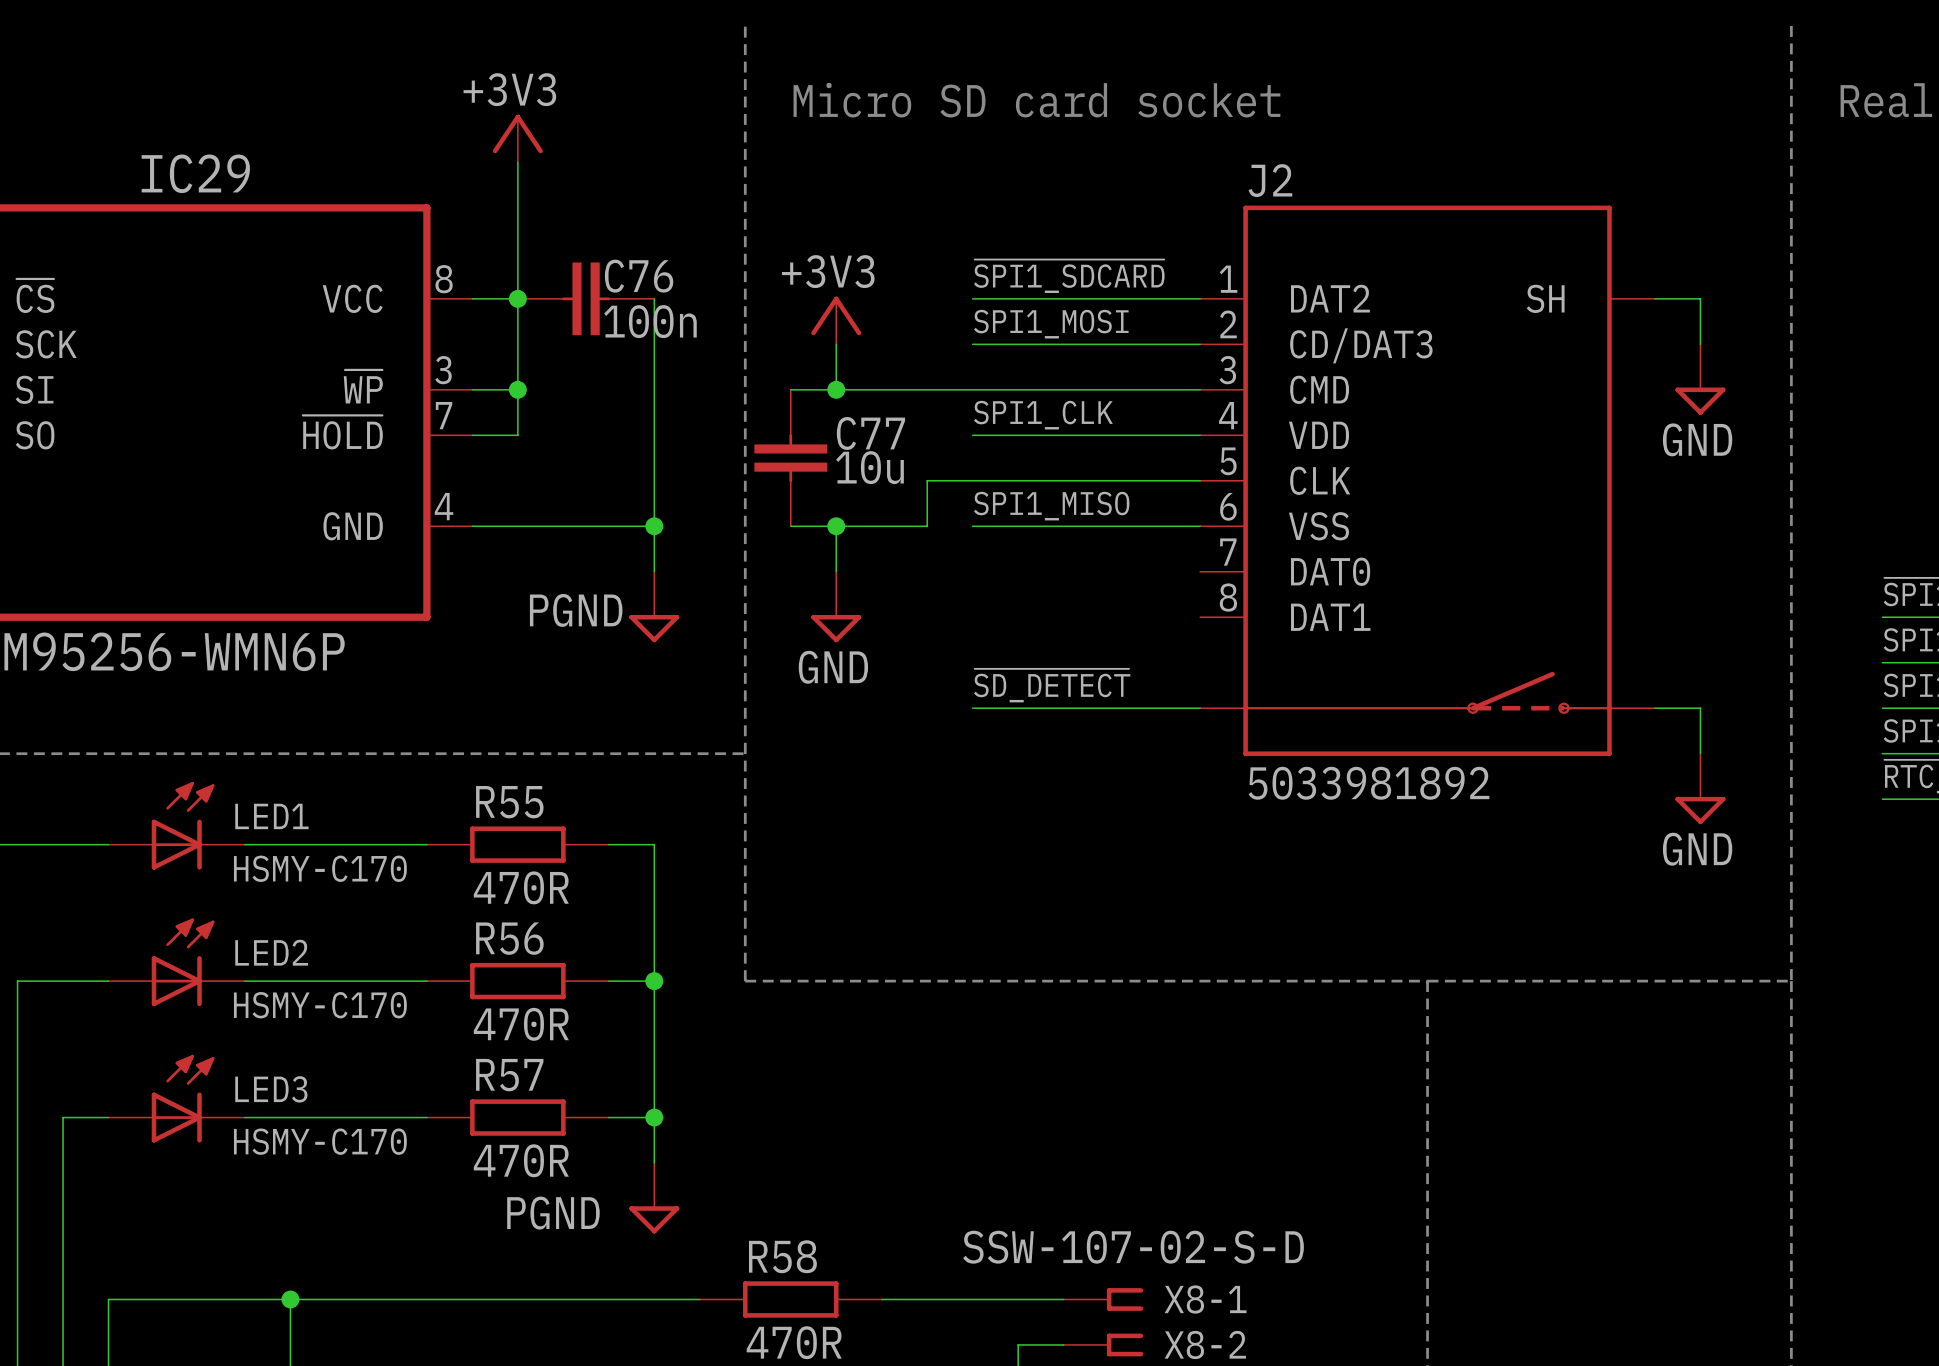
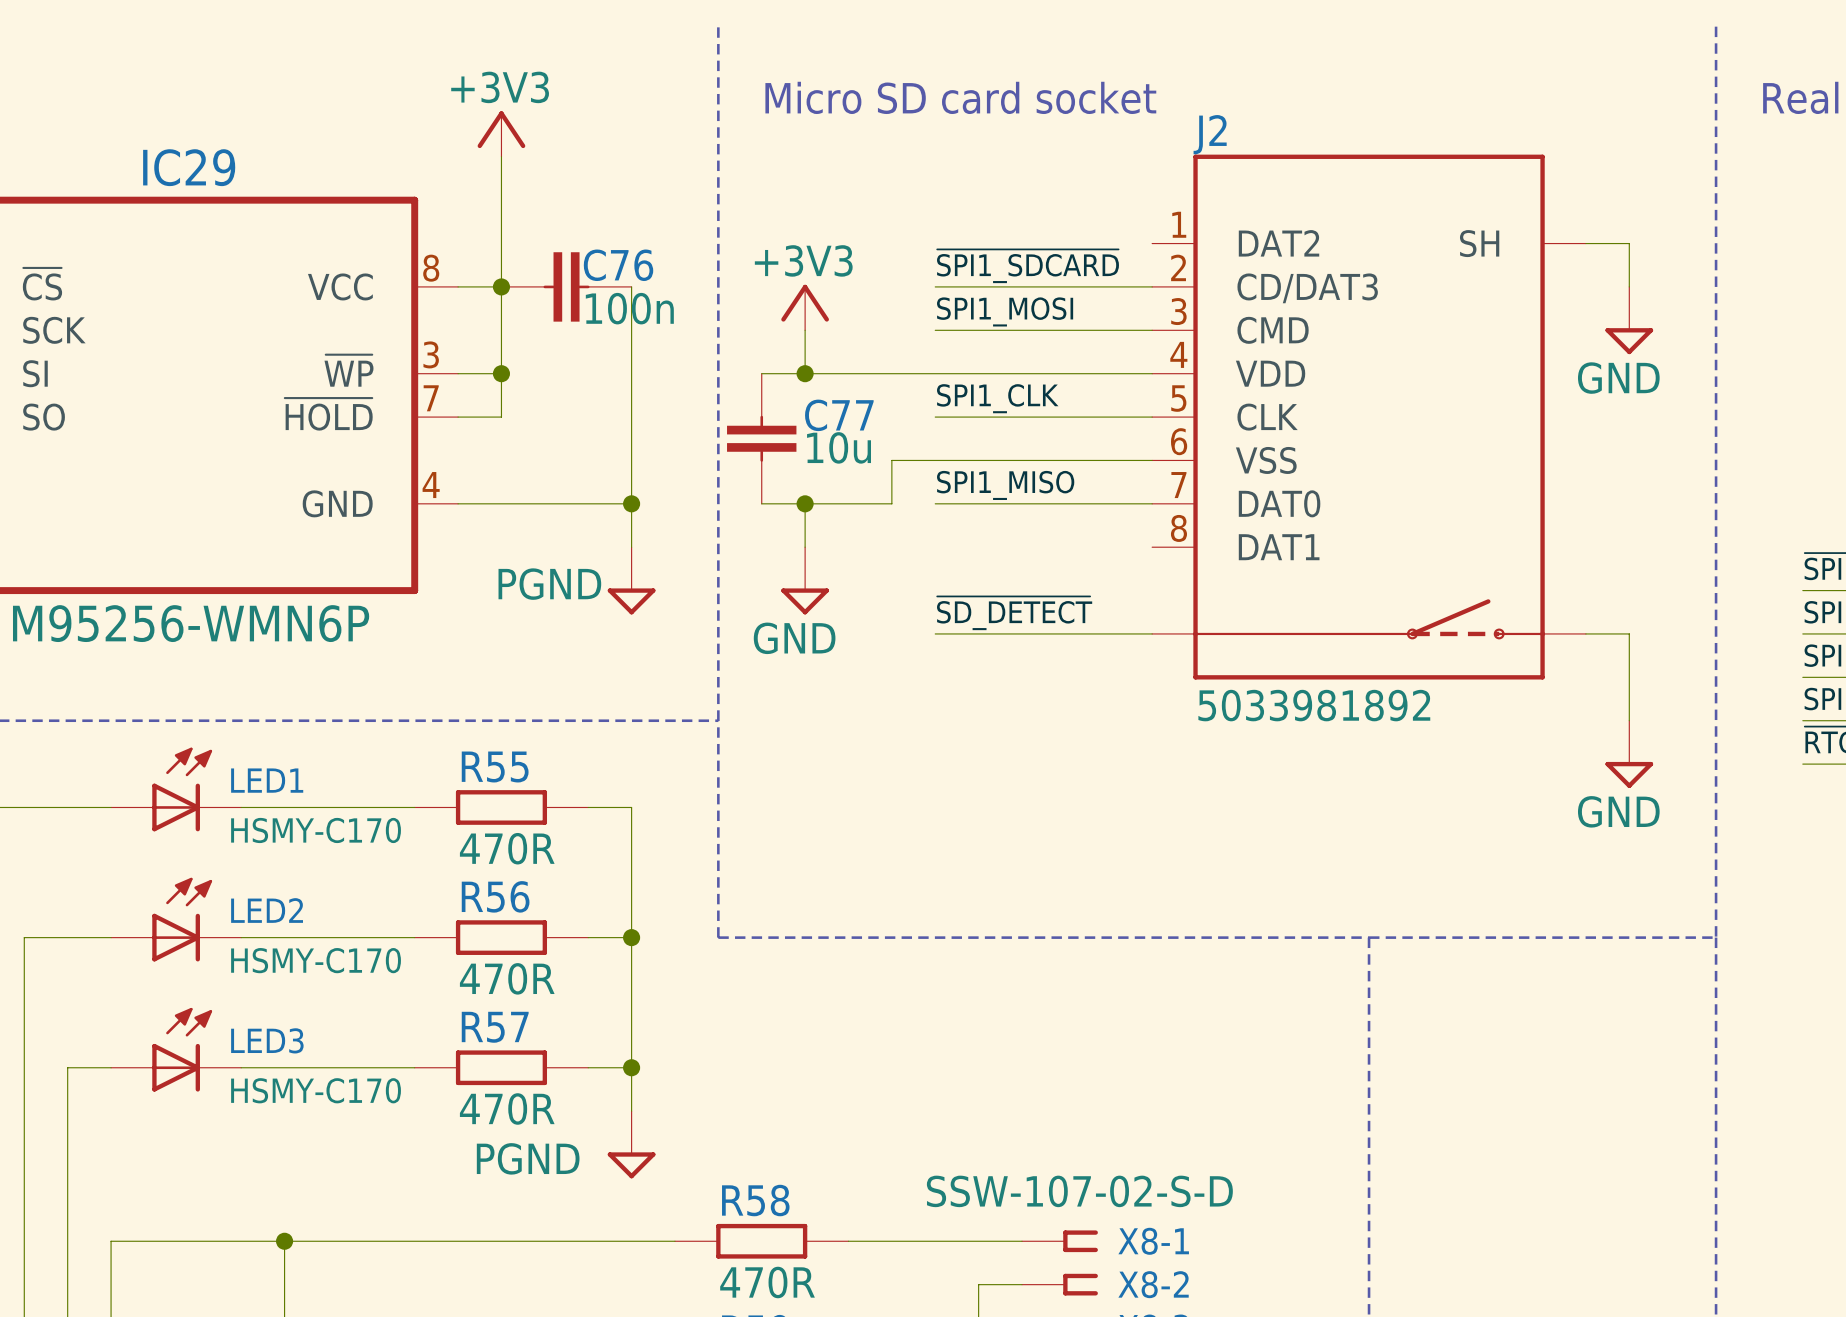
wire: (1654, 298) (1700, 298) (1700, 344) -> (1585, 243) (1629, 243) (1629, 286)
power symbol position: GND (1700, 379) -> GND (1629, 320)
J2 position: (1427, 480) -> (1369, 417)
label position: ~{SD_DETECT} (1052, 685) -> ~{SD_DETECT} (1014, 613)
wire: (972, 708) (1200, 708) -> (935, 633) (1152, 633)
wire: (1654, 708) (1700, 708) -> (1585, 633) (1629, 633) (1629, 677)

